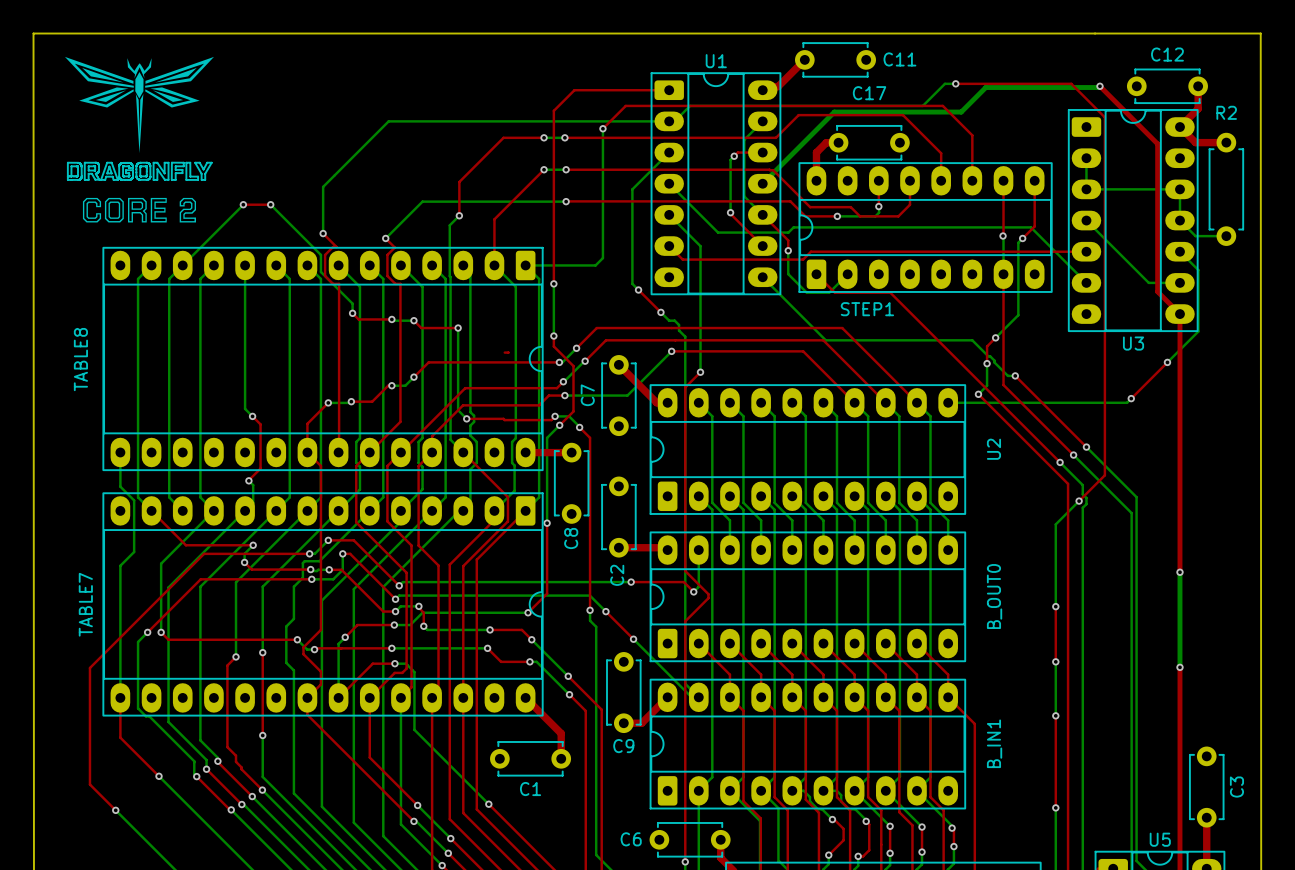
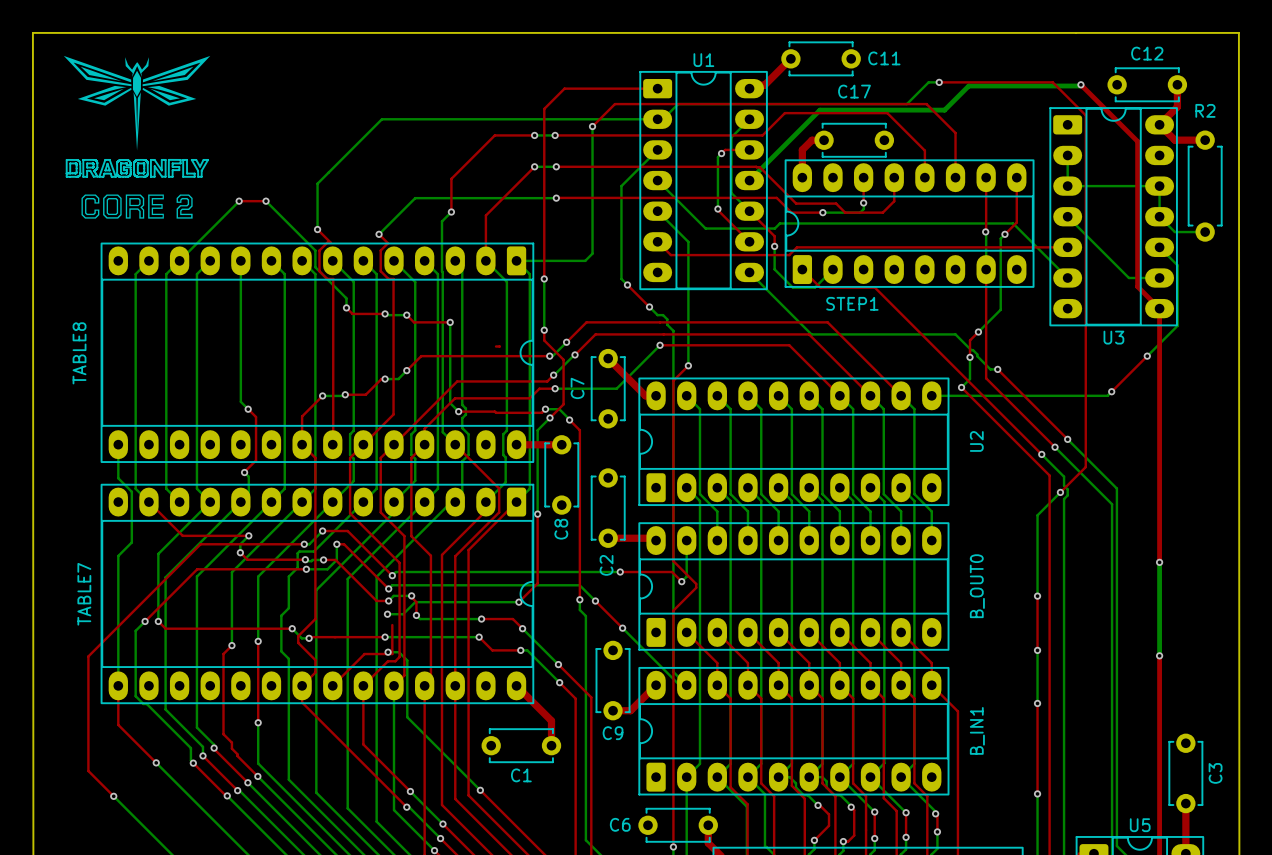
top track: (394, 625) (357, 625) (345, 637) -> none
bottom track: (345, 637) (338, 643) (338, 697) -> none
via: (345, 637) -> none
top track: (394, 663) (372, 663) (371, 665) -> (392, 625) (392, 654) (364, 654)

